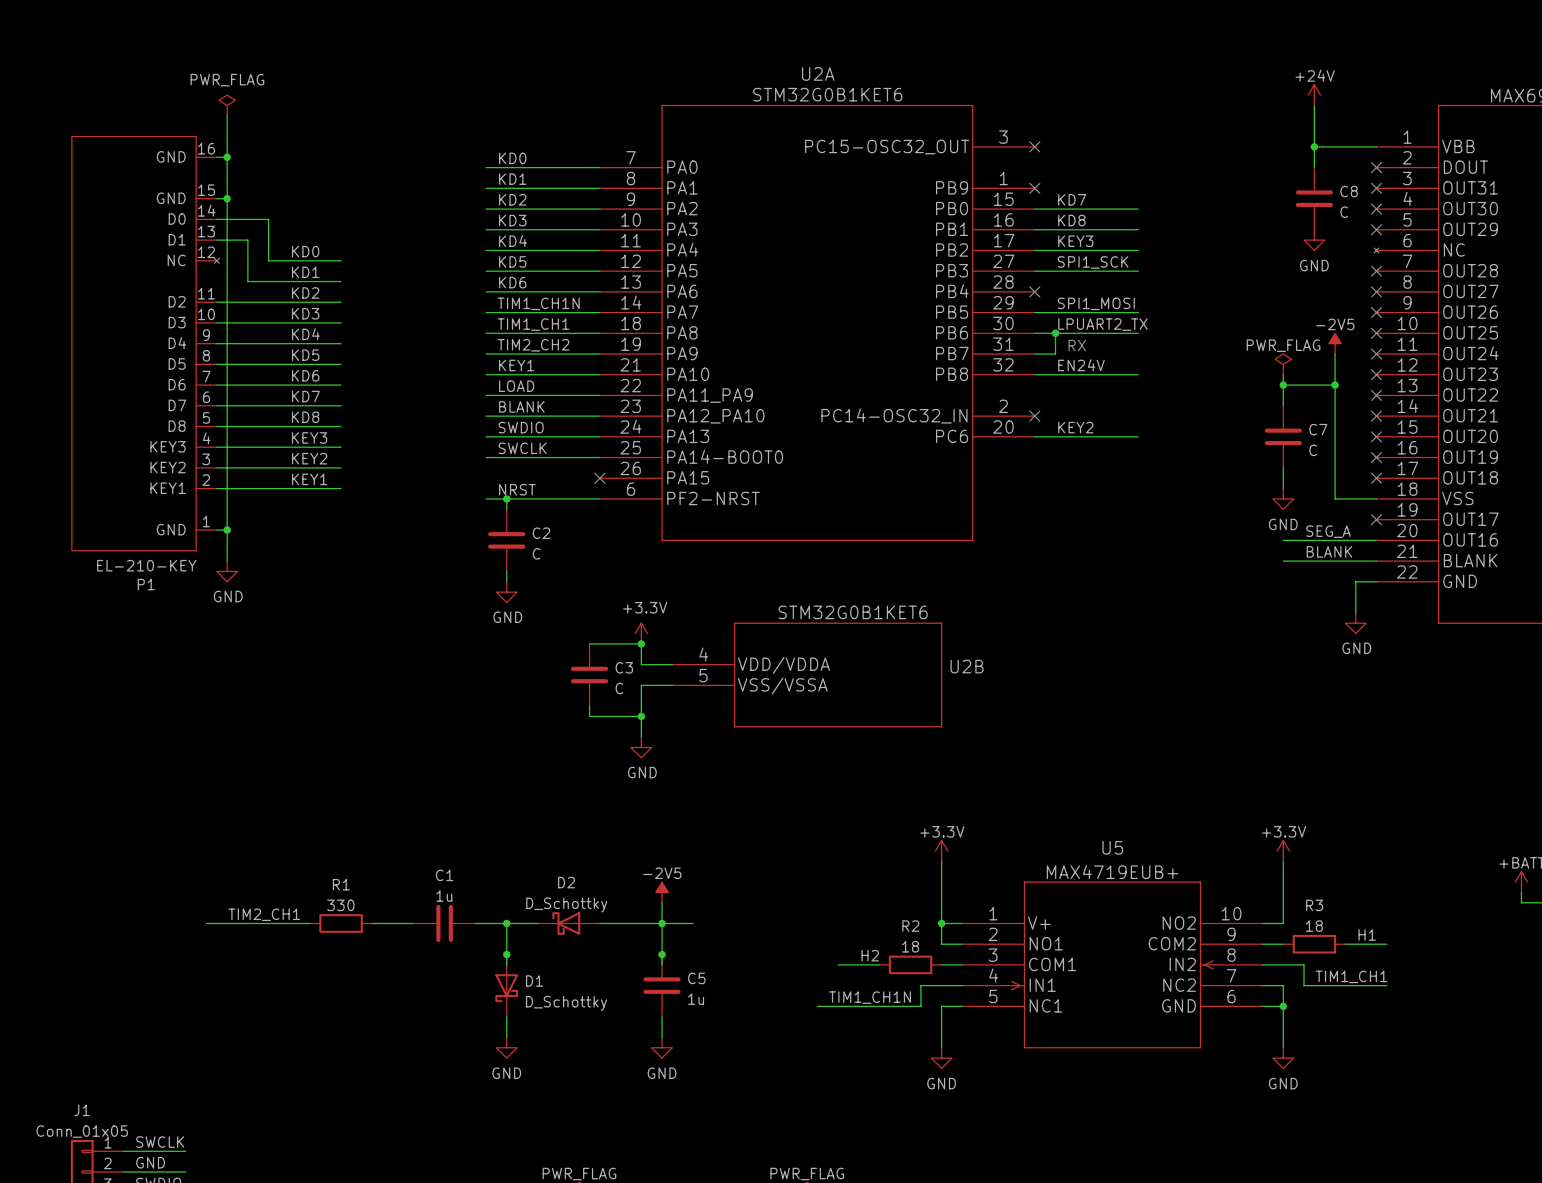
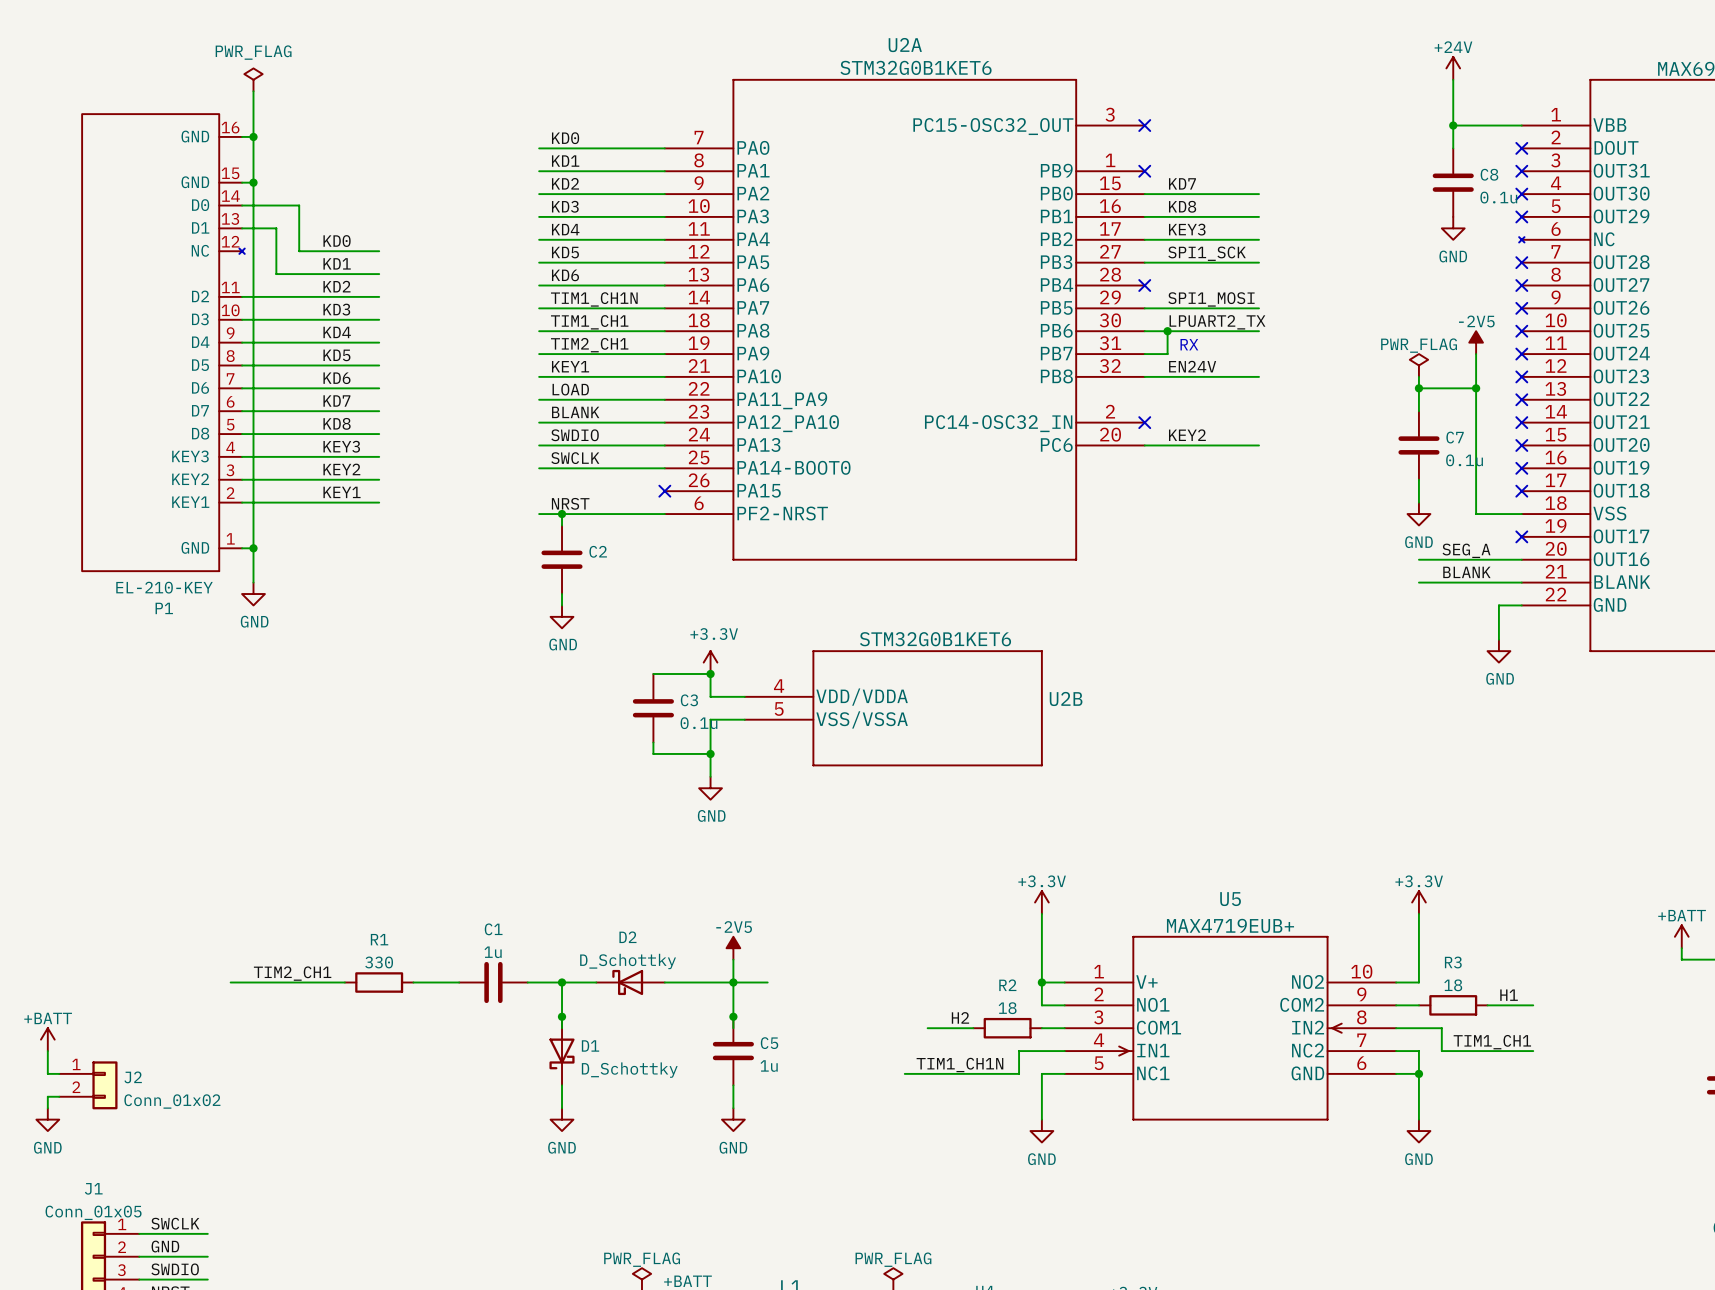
C8 value: C (1344, 212) -> 0.1u (1498, 197)
label: TIM2_CH2 (533, 345) -> TIM2_CH1 (589, 345)
C7 value: C (1313, 450) -> 0.1u (1464, 460)
C2 value: C (536, 553) -> none
C3 value: C (619, 688) -> 0.1u (698, 723)
power symbol: none -> +BATT (47, 1039)
wire: none -> (47, 1051) (47, 1073) (59, 1073)
J2: none -> Conn_01x02 (88, 1085)
wire: none -> (59, 1096) (47, 1096) (47, 1108)
power symbol: none -> GND (47, 1119)

